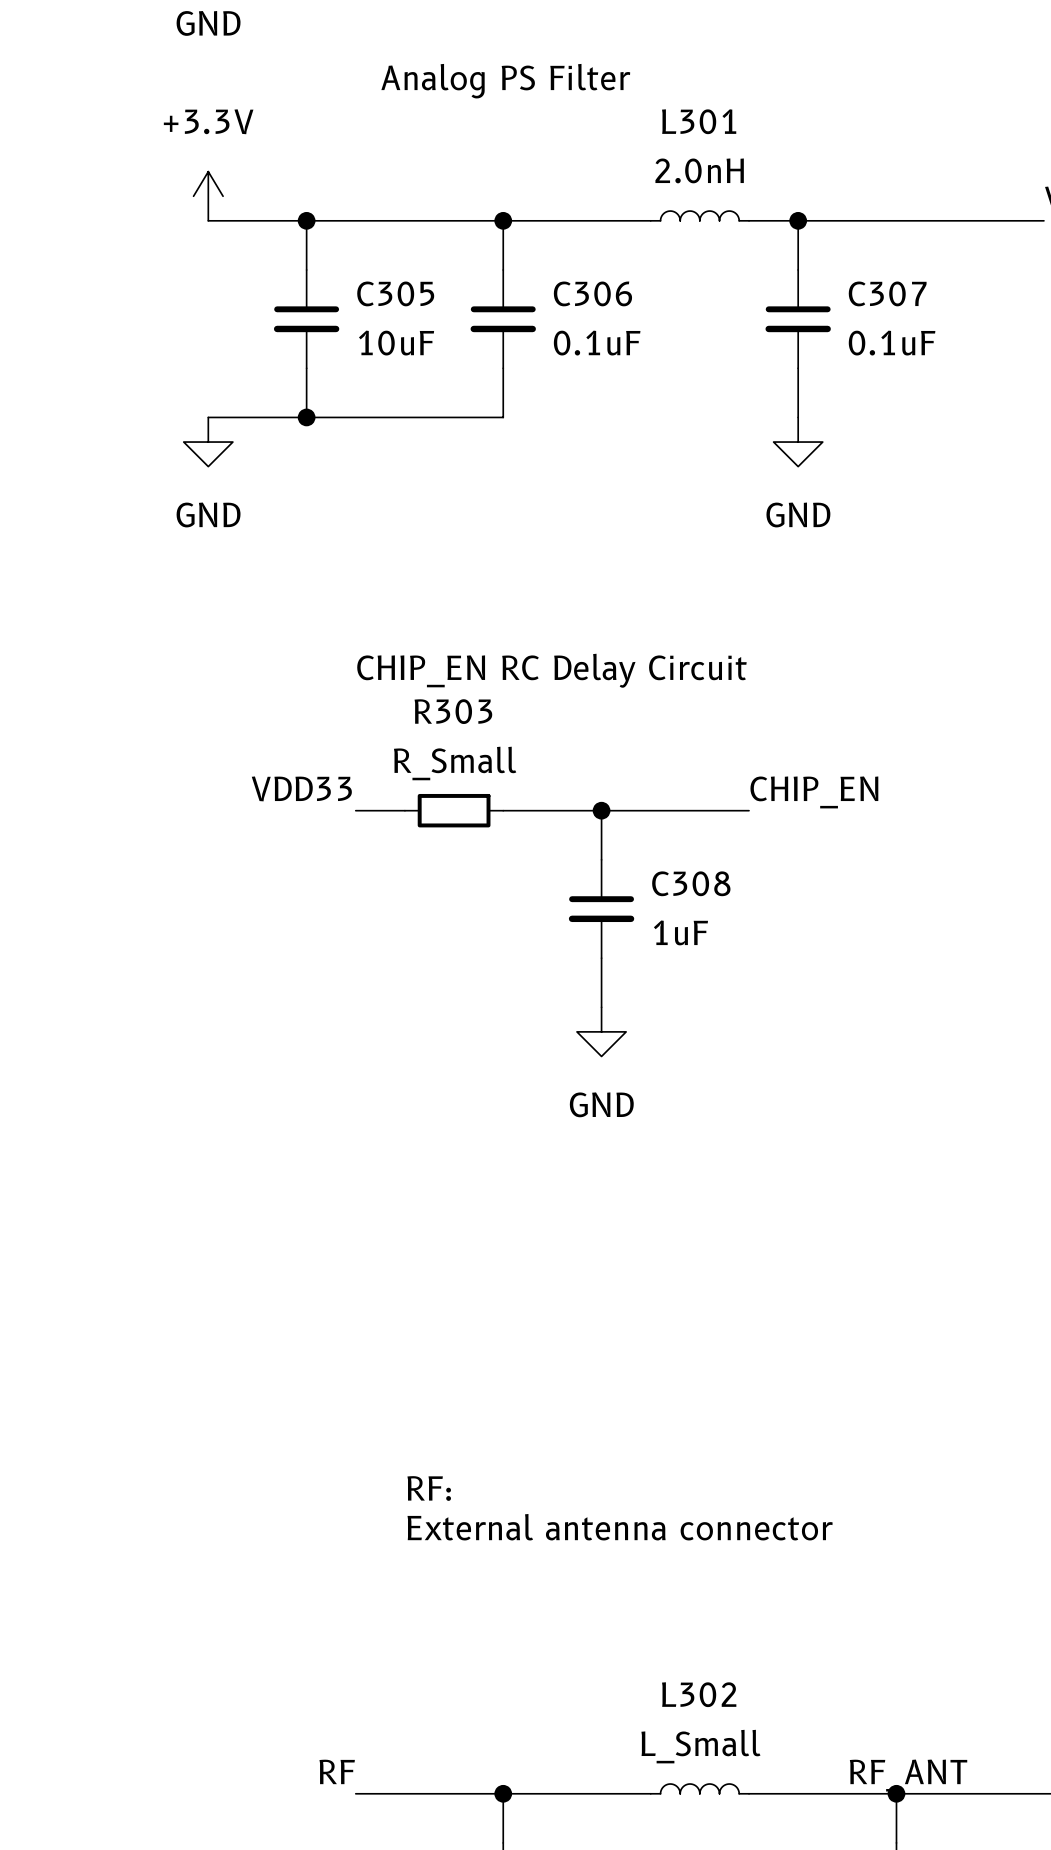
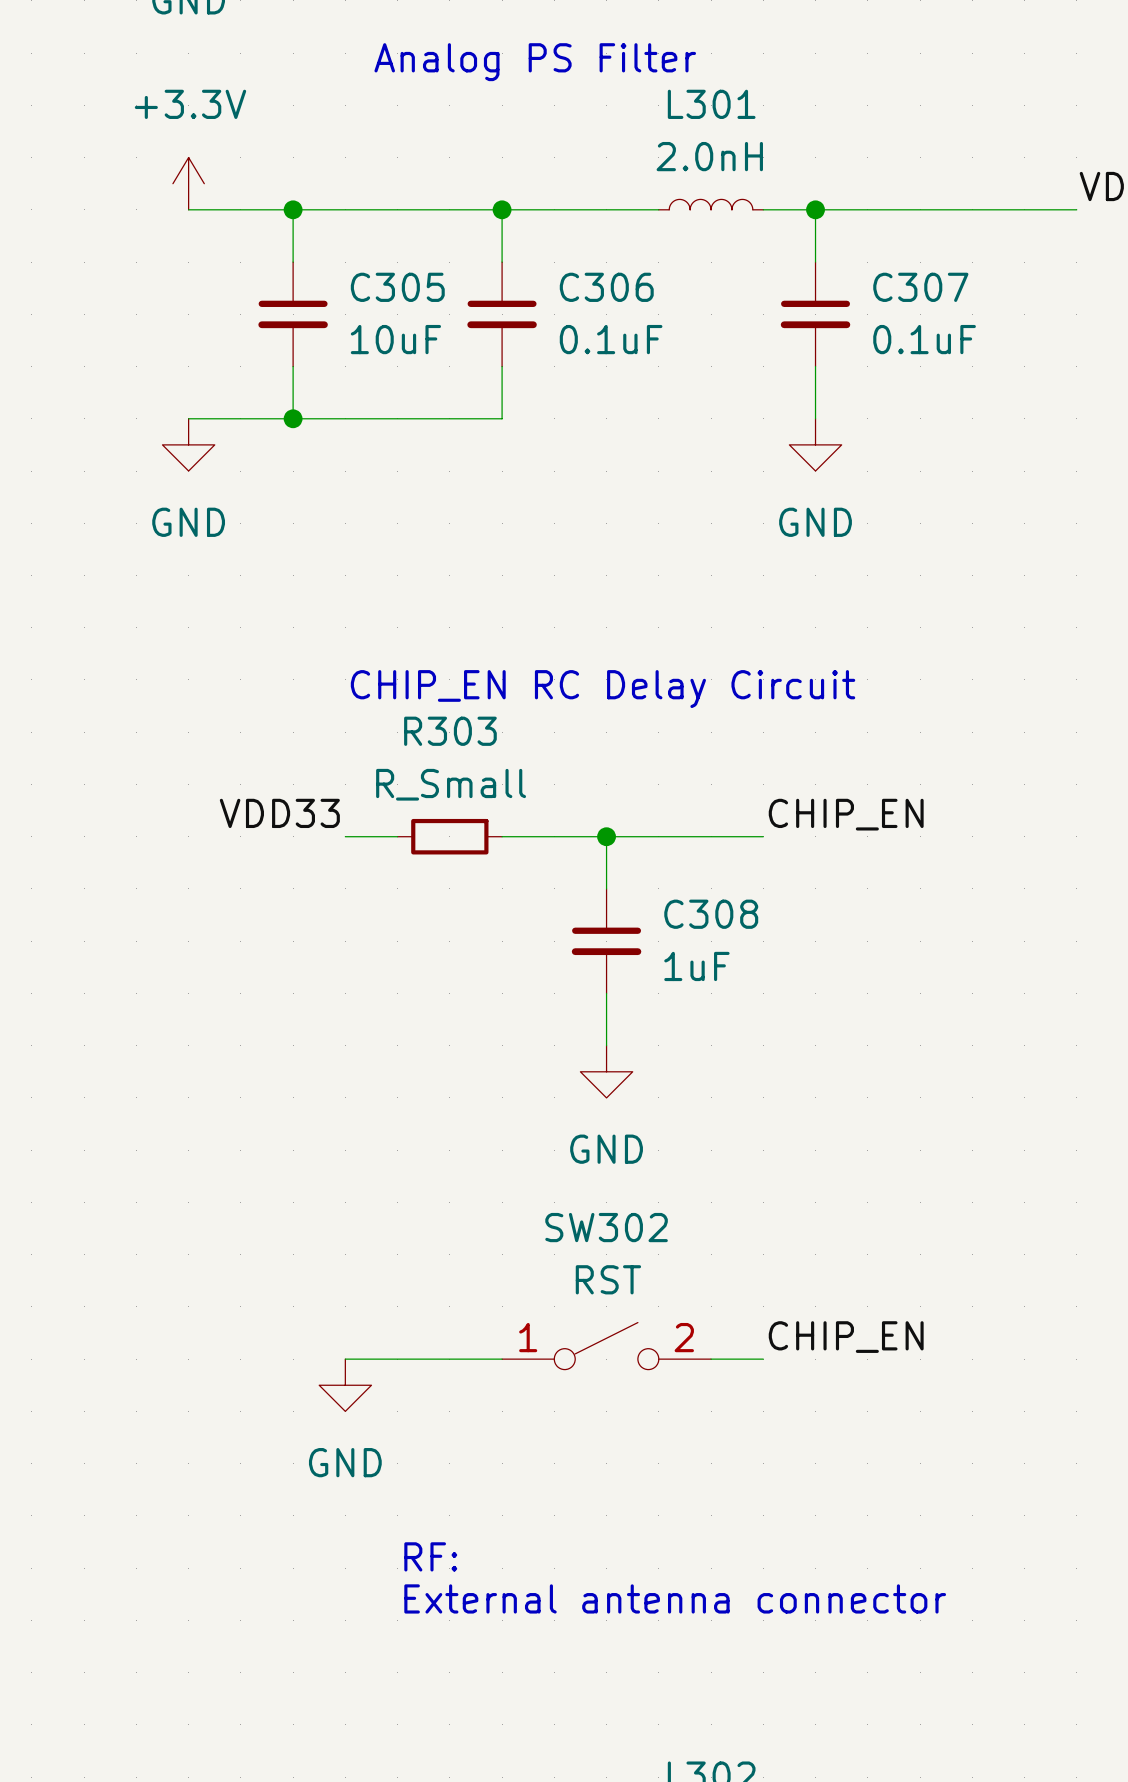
label: none -> CHIP_EN (846, 1337)
SW302: none -> RST (606, 1346)
wire: none -> (345, 1359) (502, 1359)
wire: none -> (711, 1359) (763, 1359)
power symbol: none -> GND (345, 1385)

